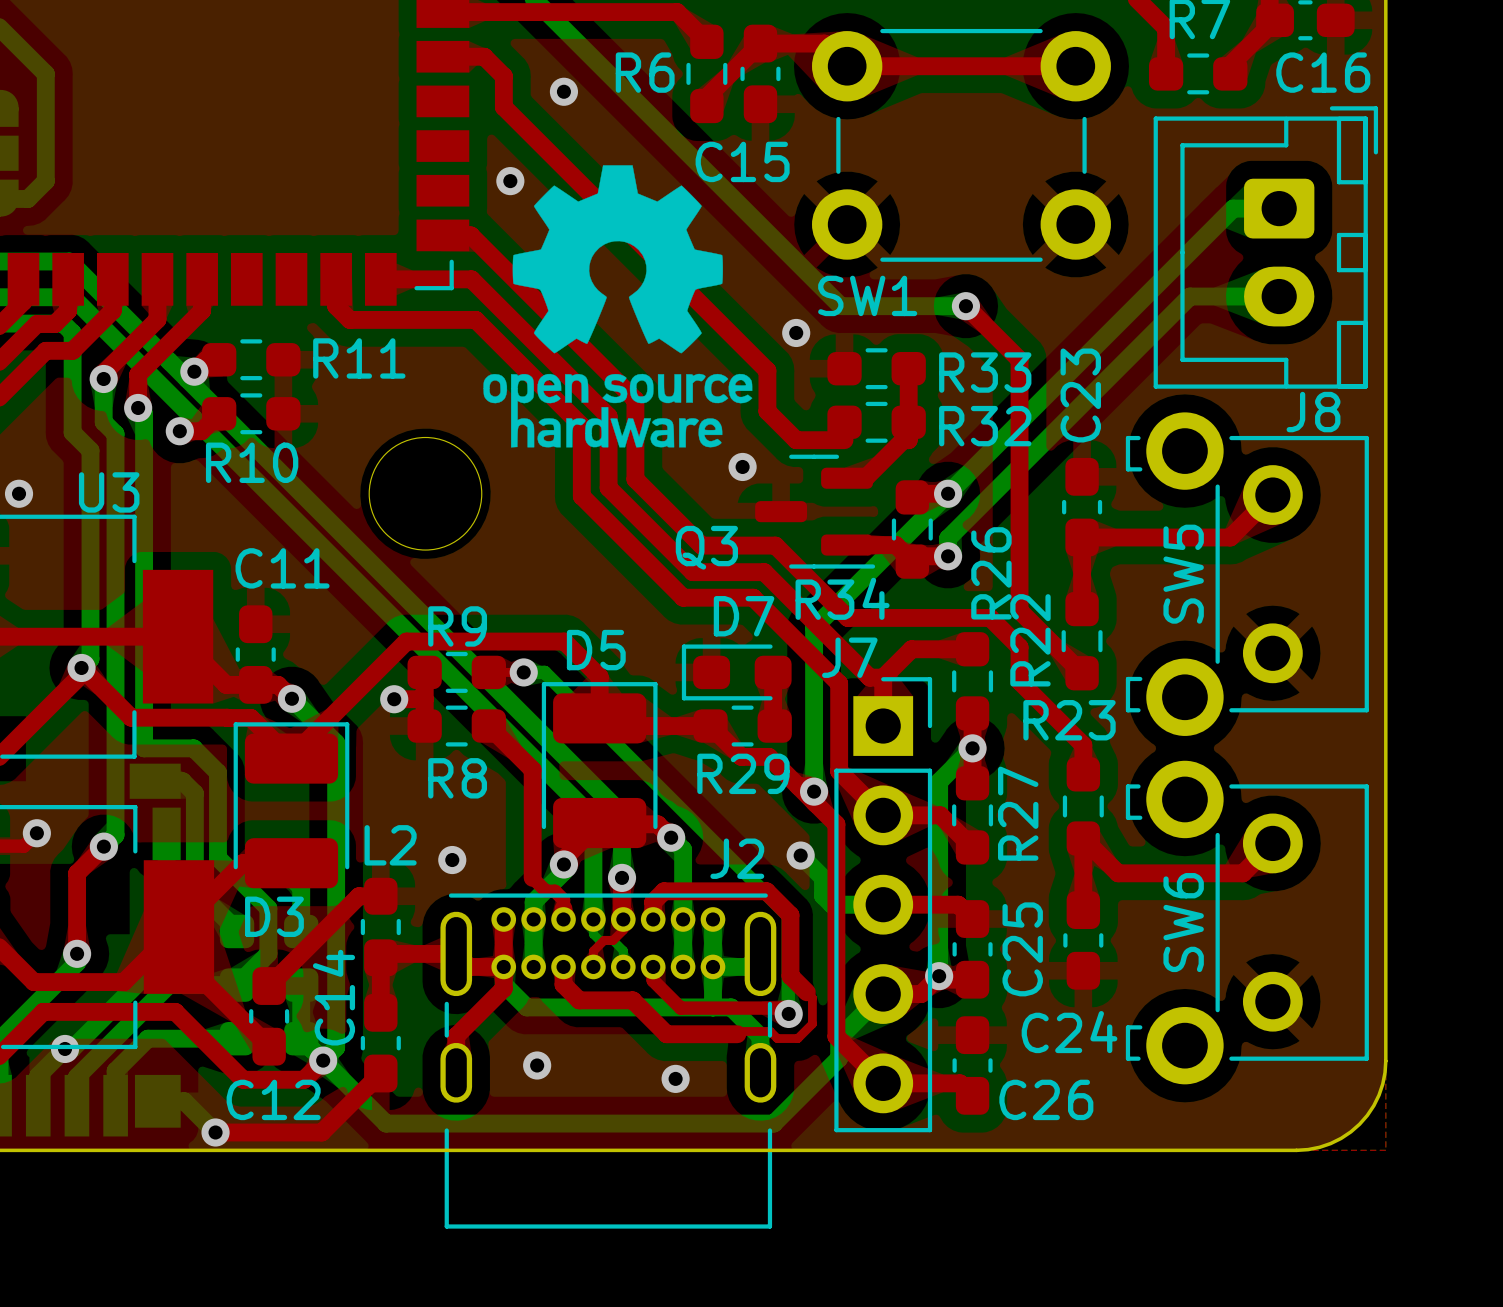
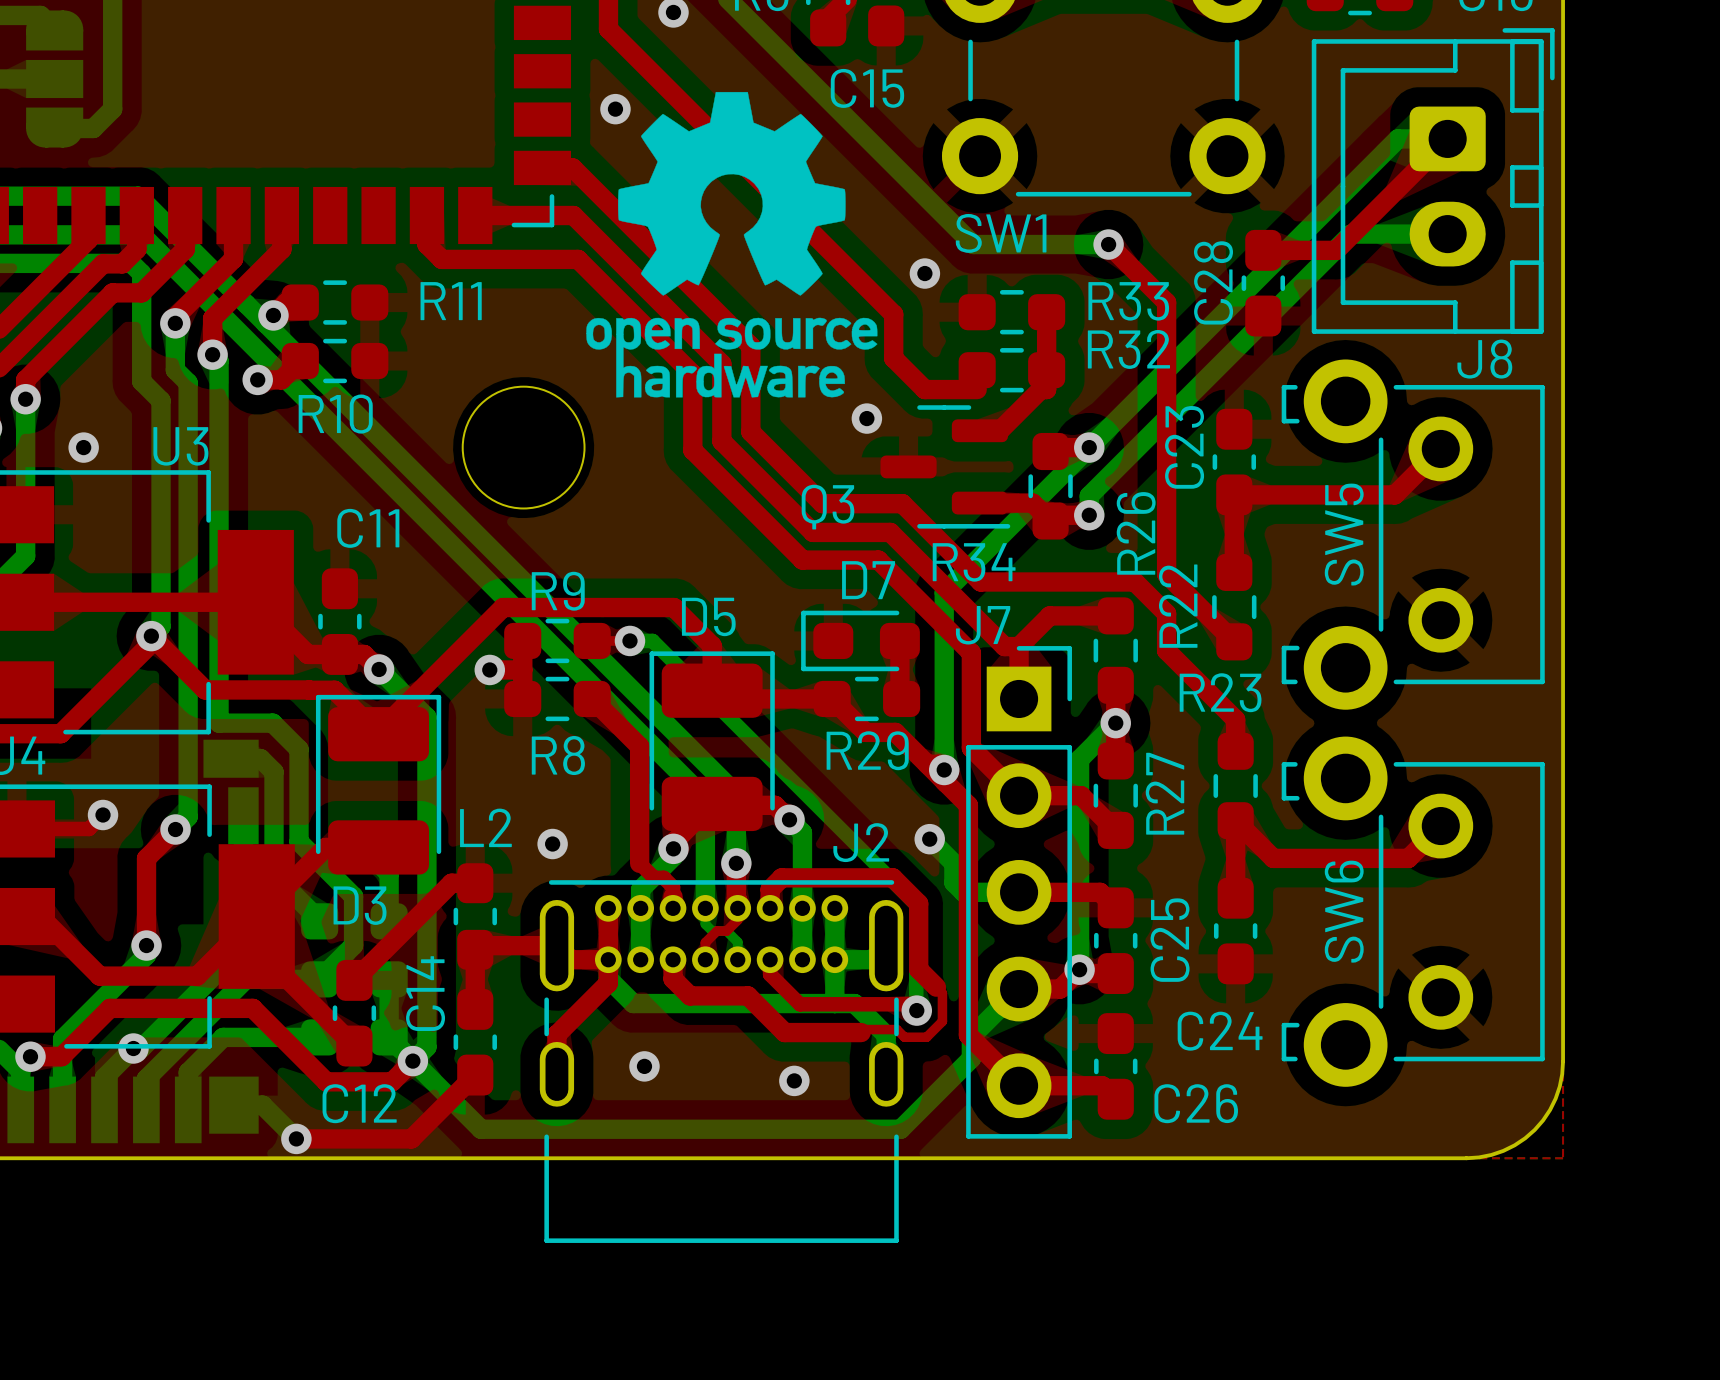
top track: none -> (1447, 138) (1336, 250) (1263, 250)
C28: none -> (1263, 283)
R33 name position: R33 (985, 372) -> R33 (1128, 301)
C23 name position: C23 (1080, 395) -> C23 (1184, 447)
R32 name position: R32 (985, 426) -> R32 (1128, 349)

